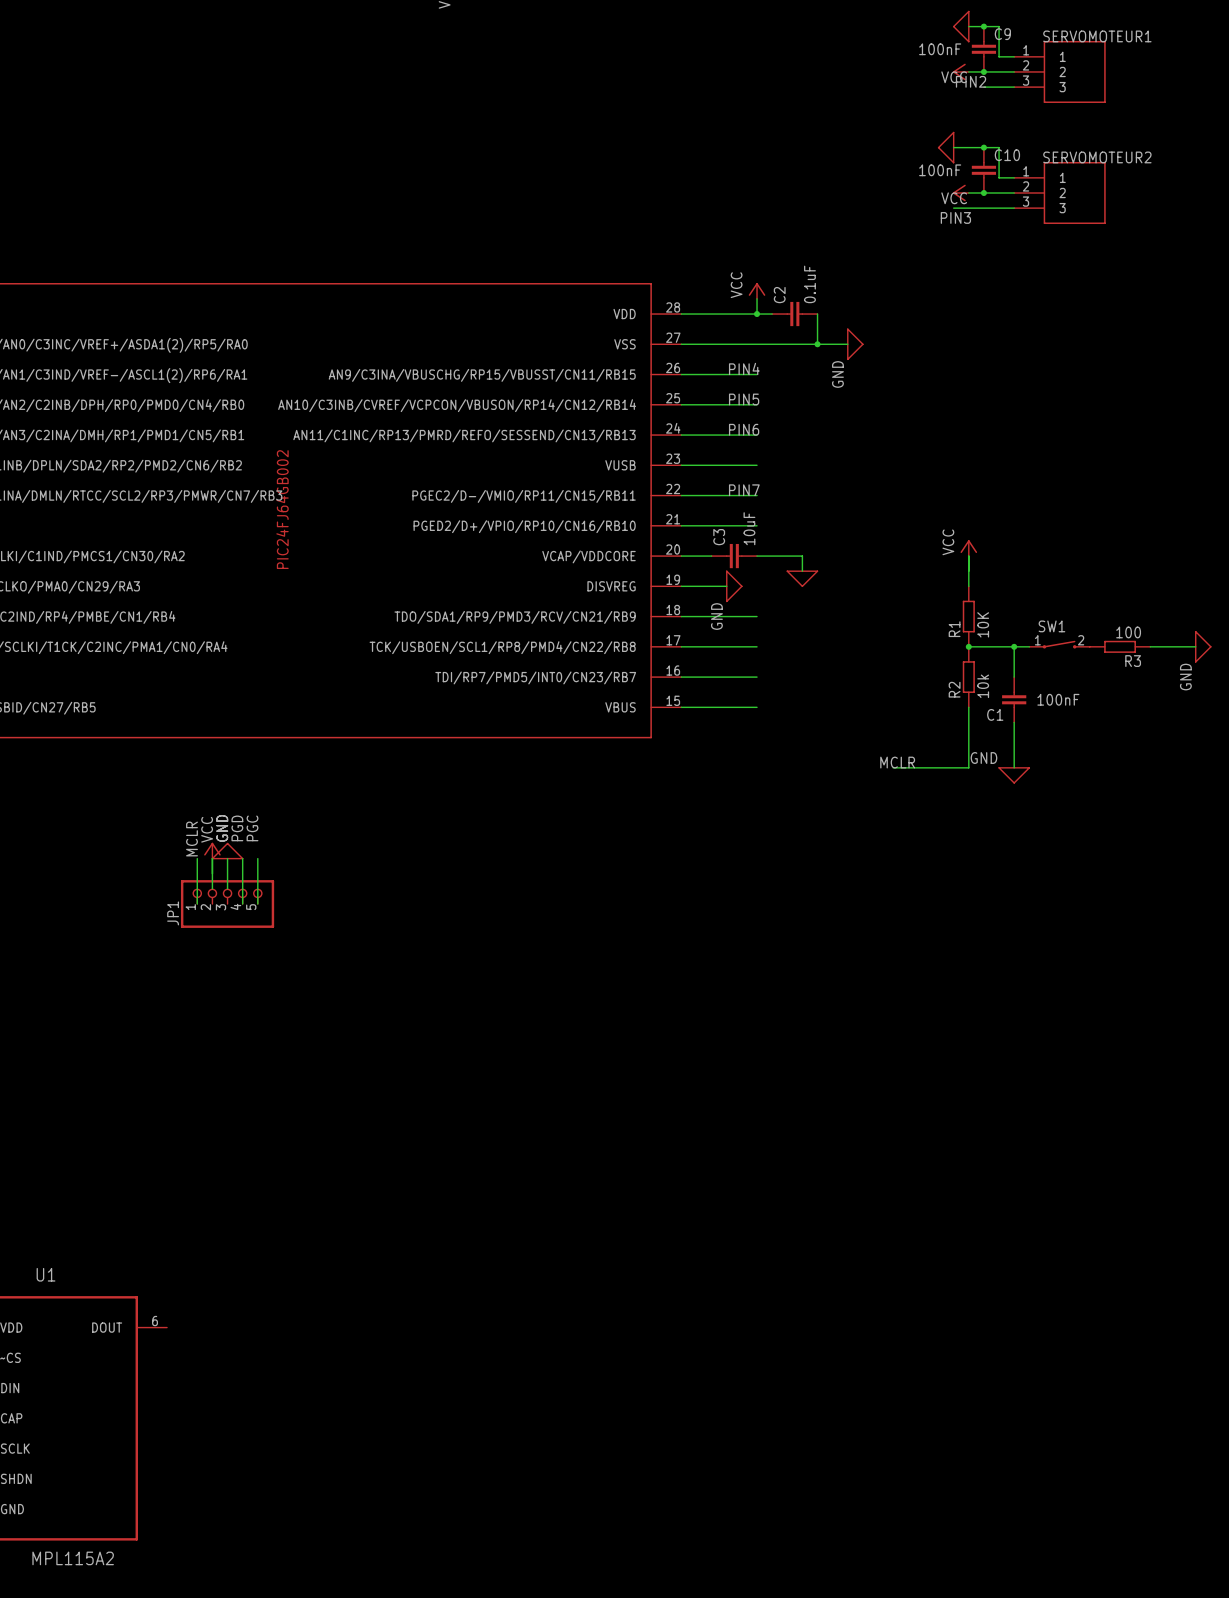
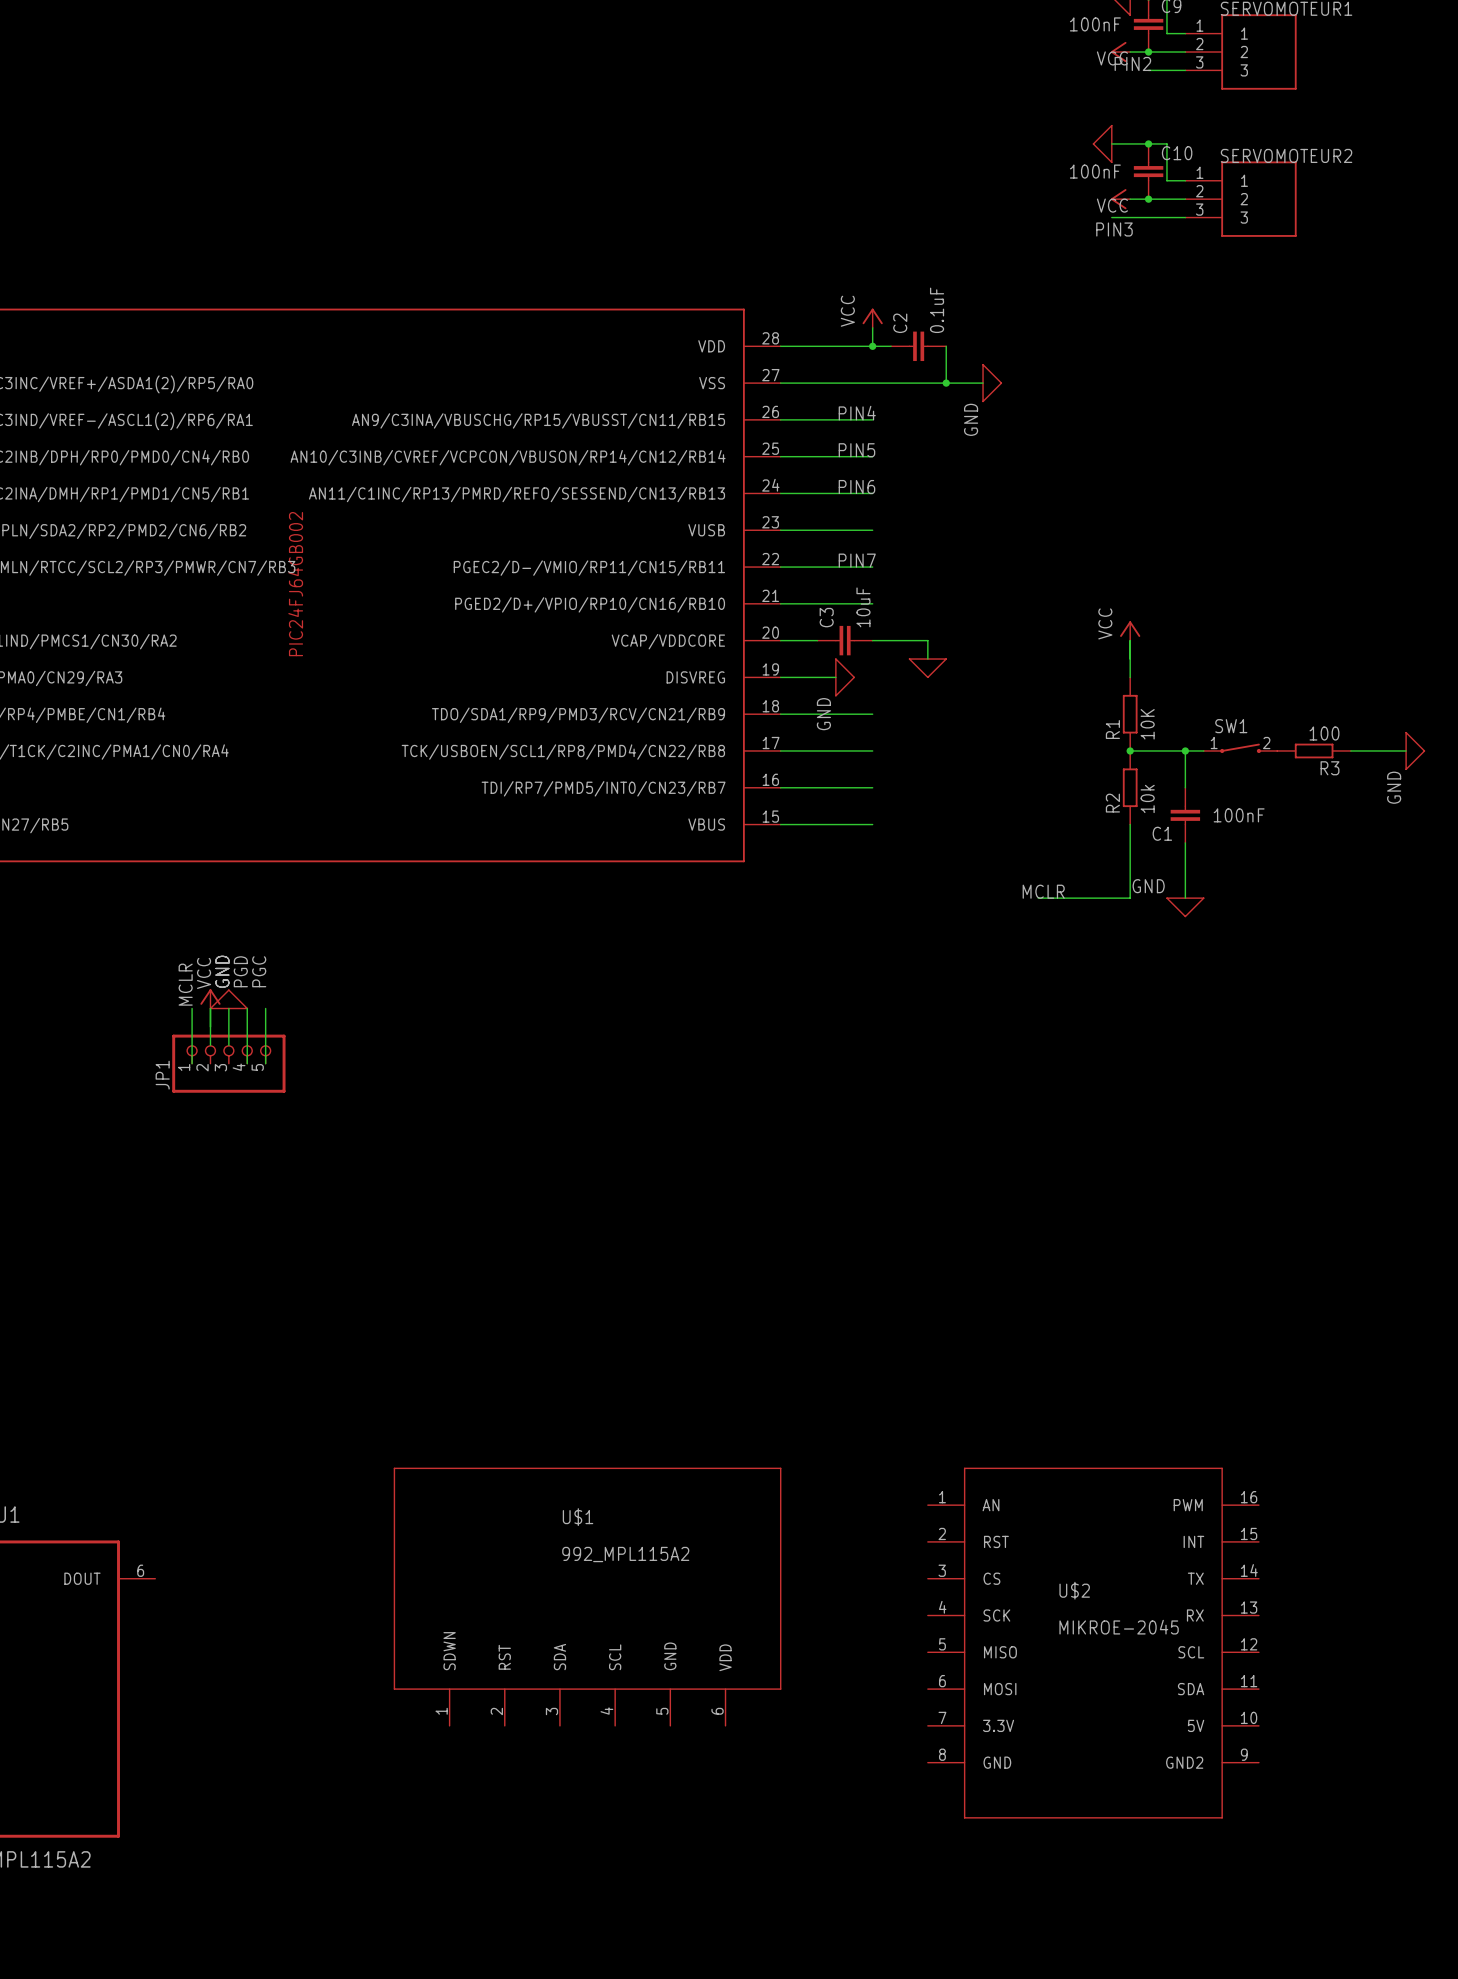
U$1: none -> 992_MPL115A2 (587, 1596)
U$2: none -> MIKROE-2045 (1093, 1643)

